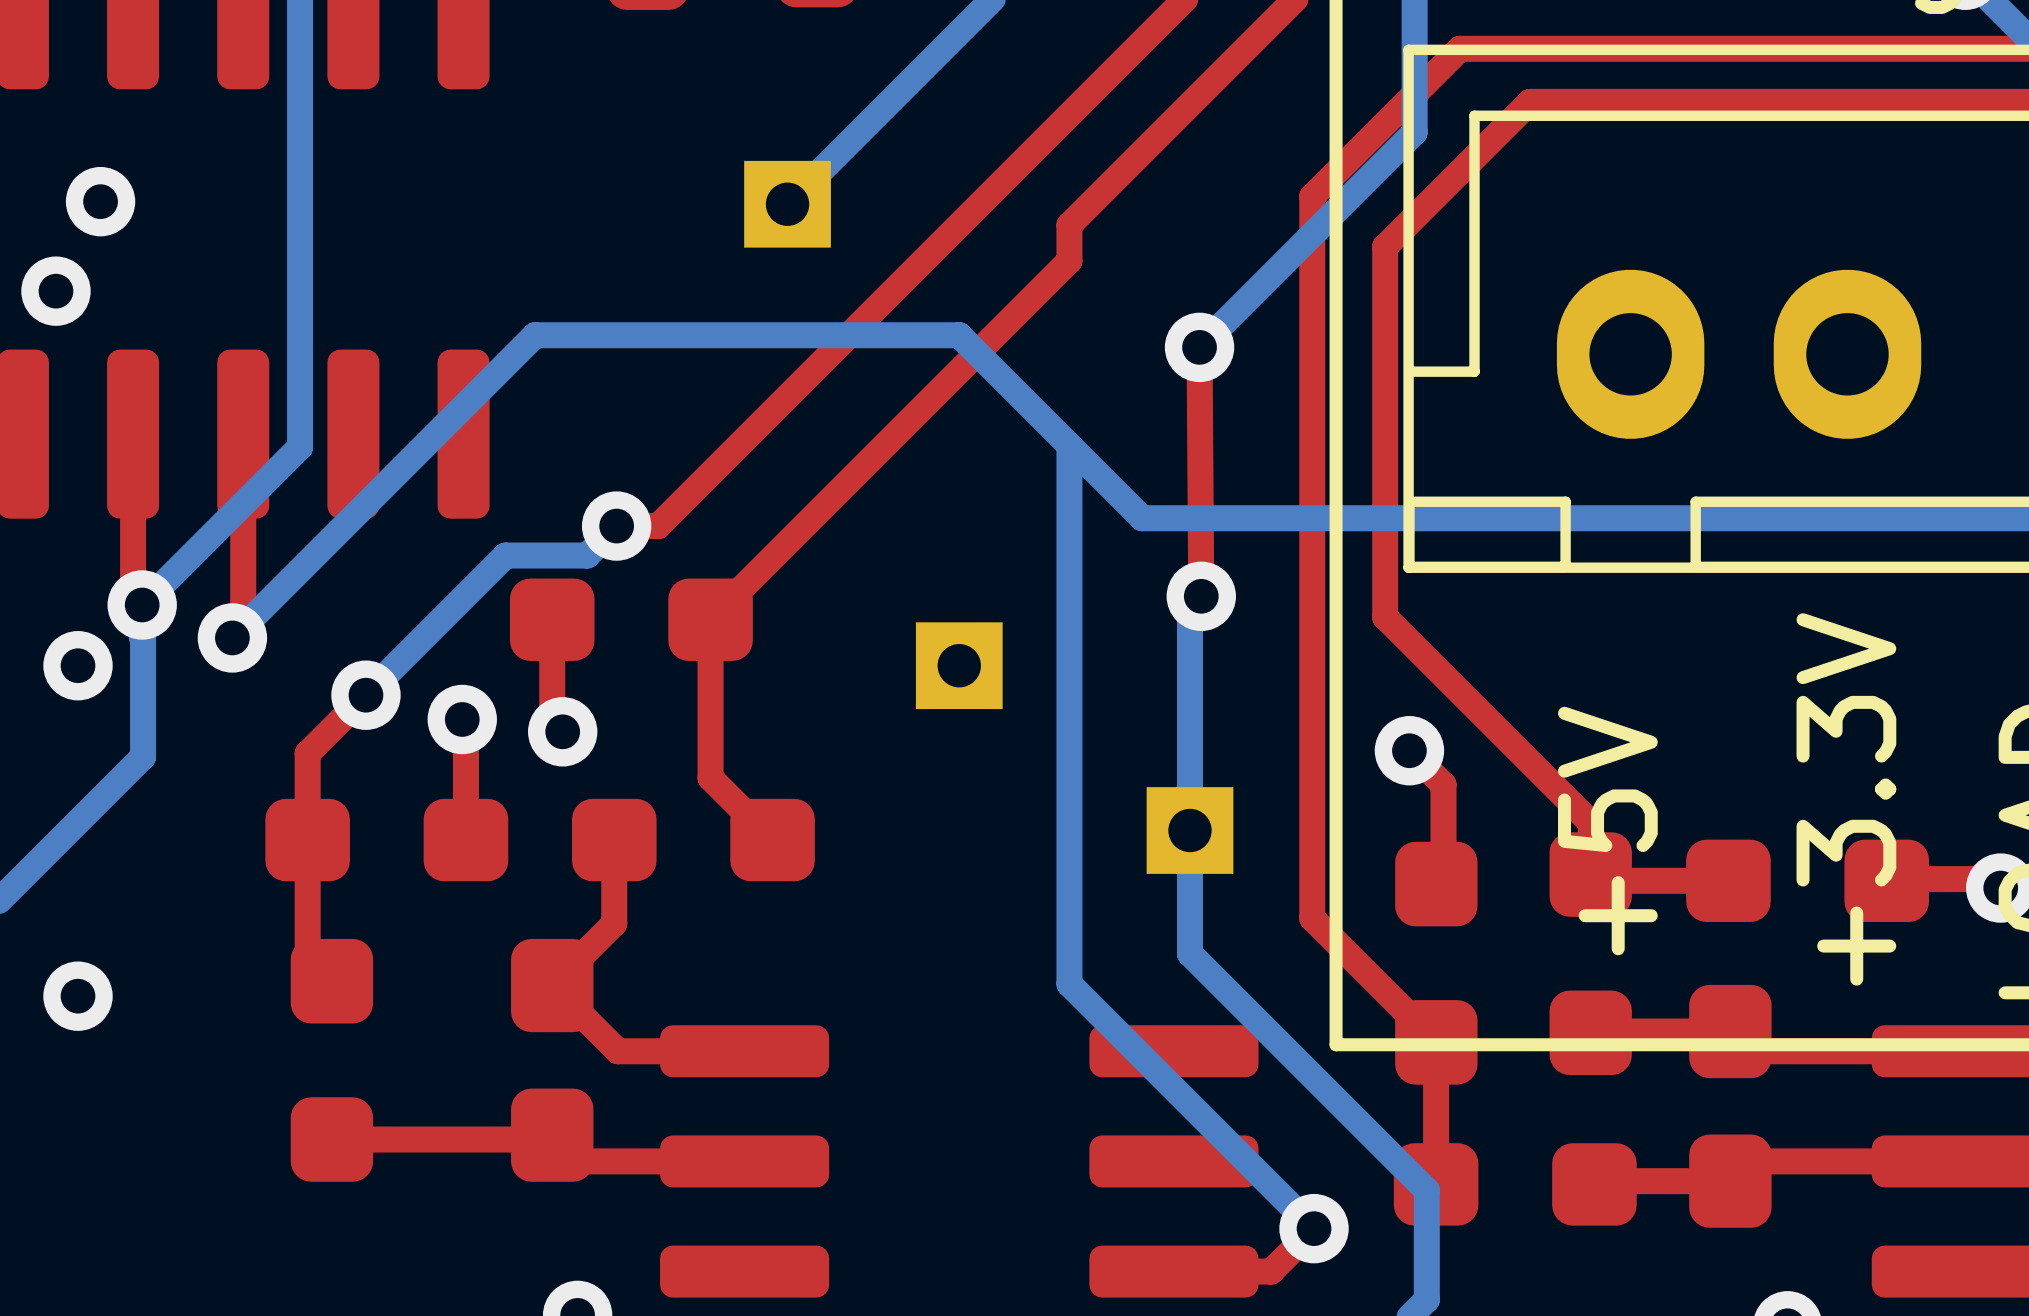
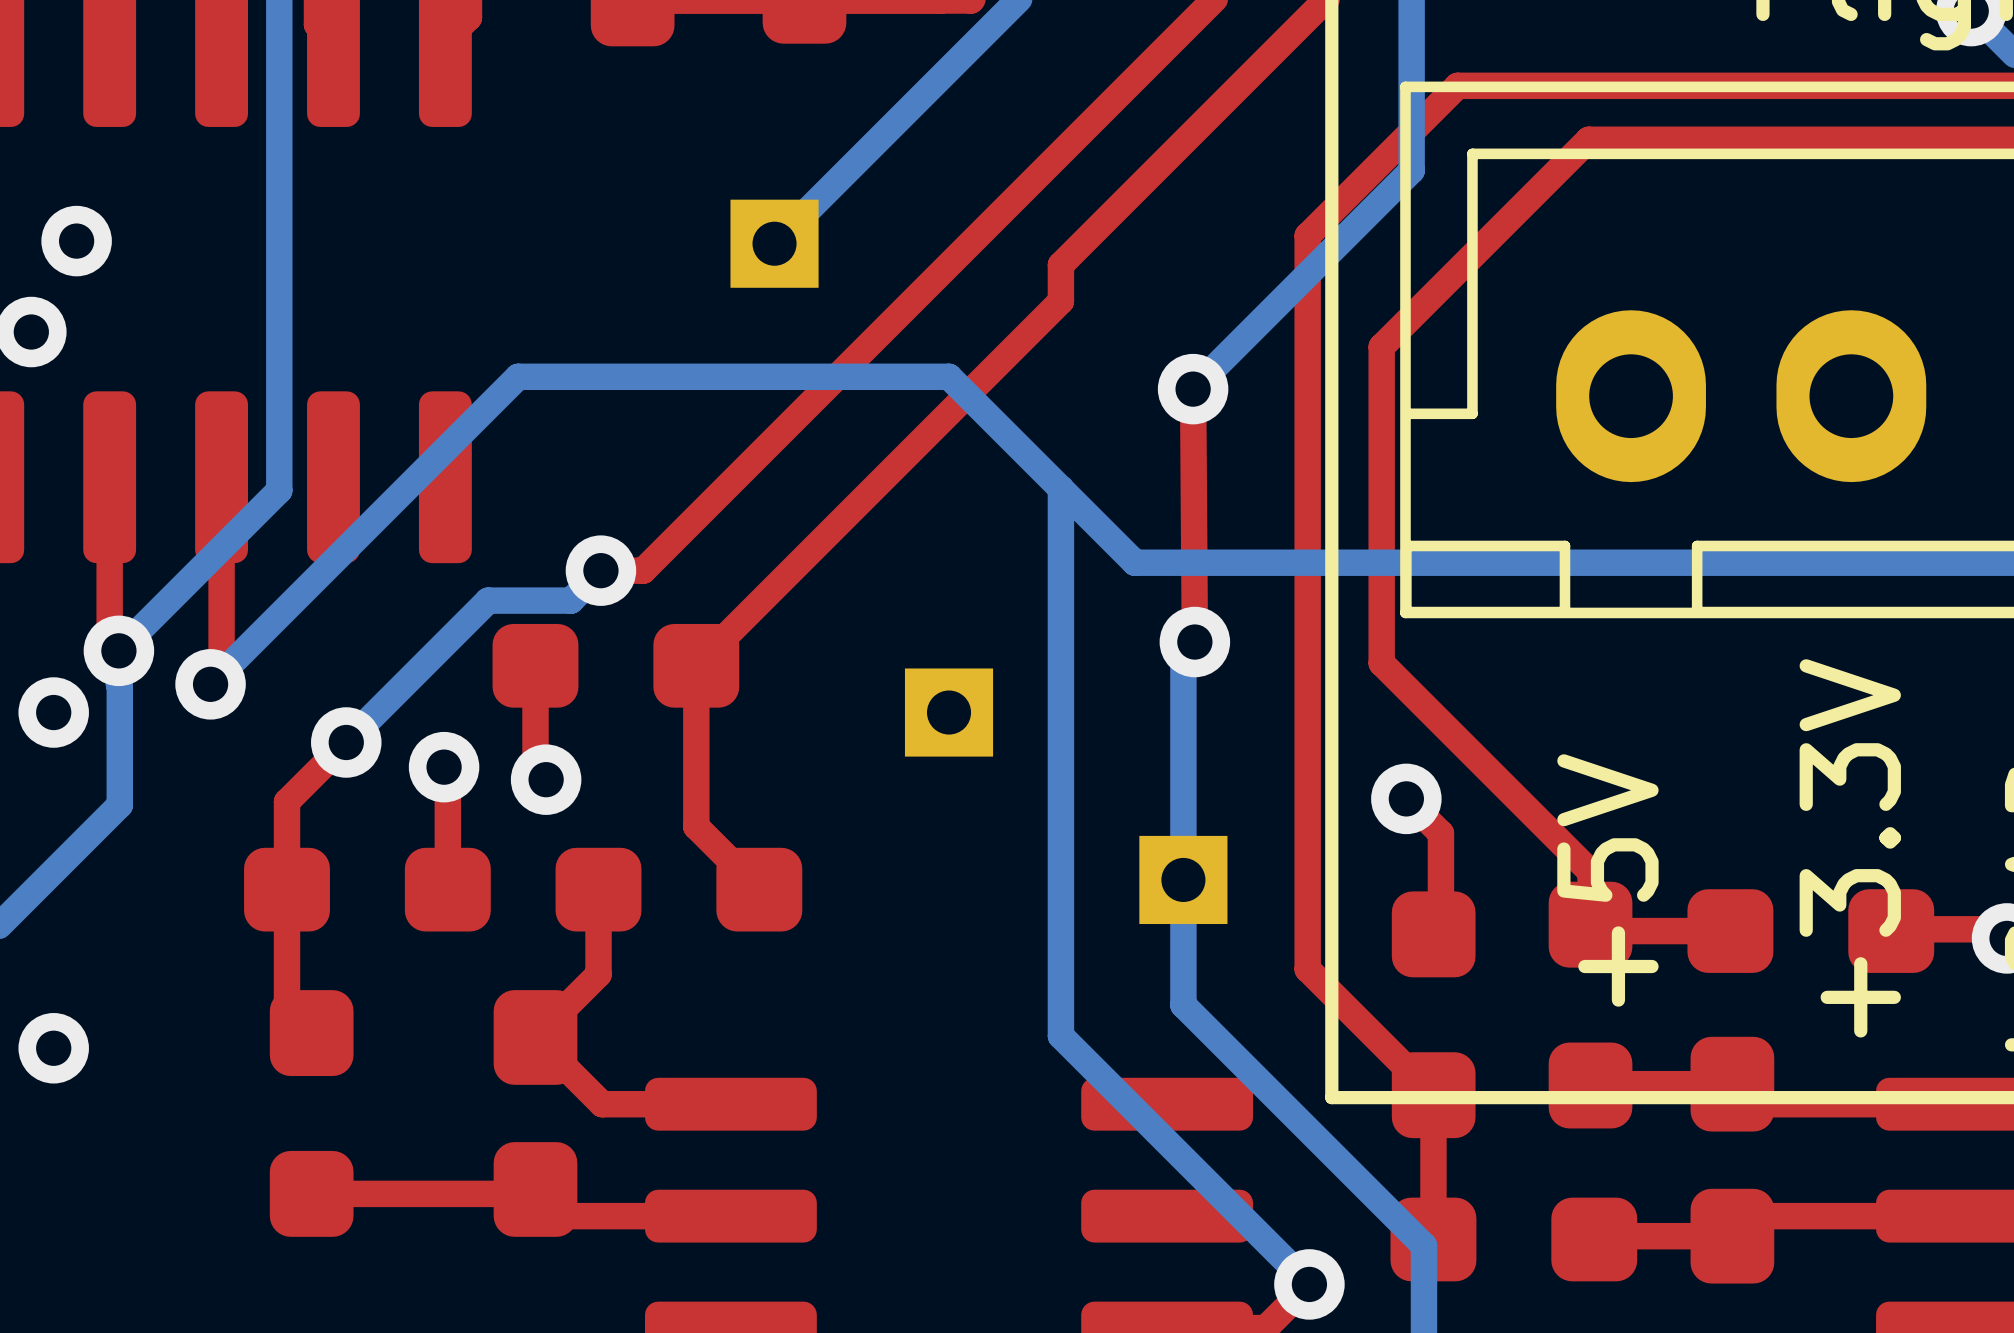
top track: (1589, 101) (1530, 101) (1385, 246) (1385, 305) -> (1588, 139) (1381, 346)

